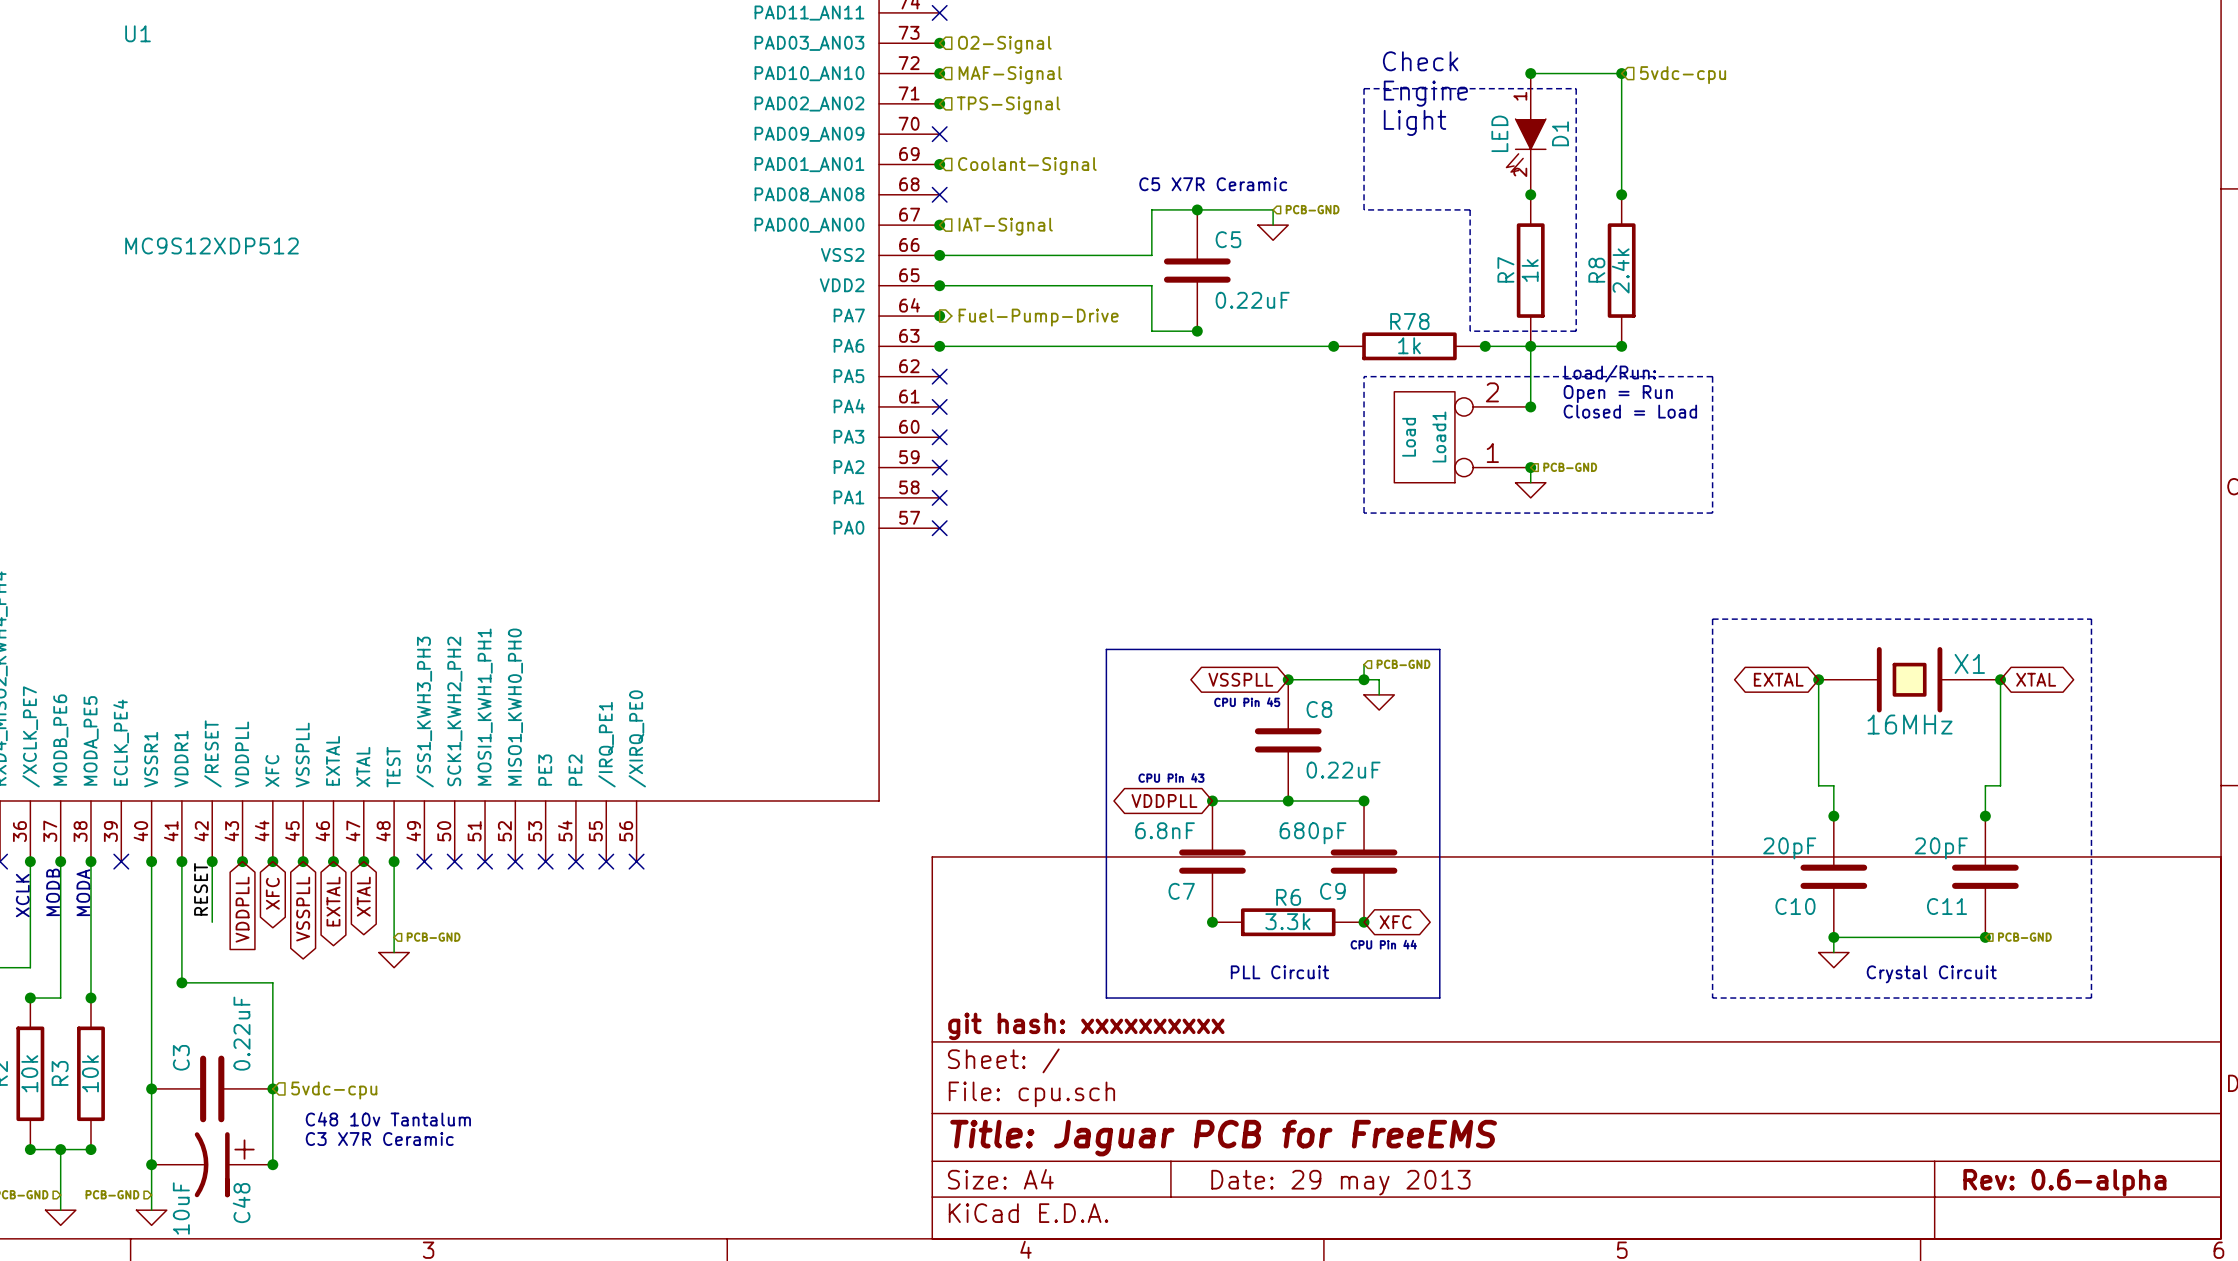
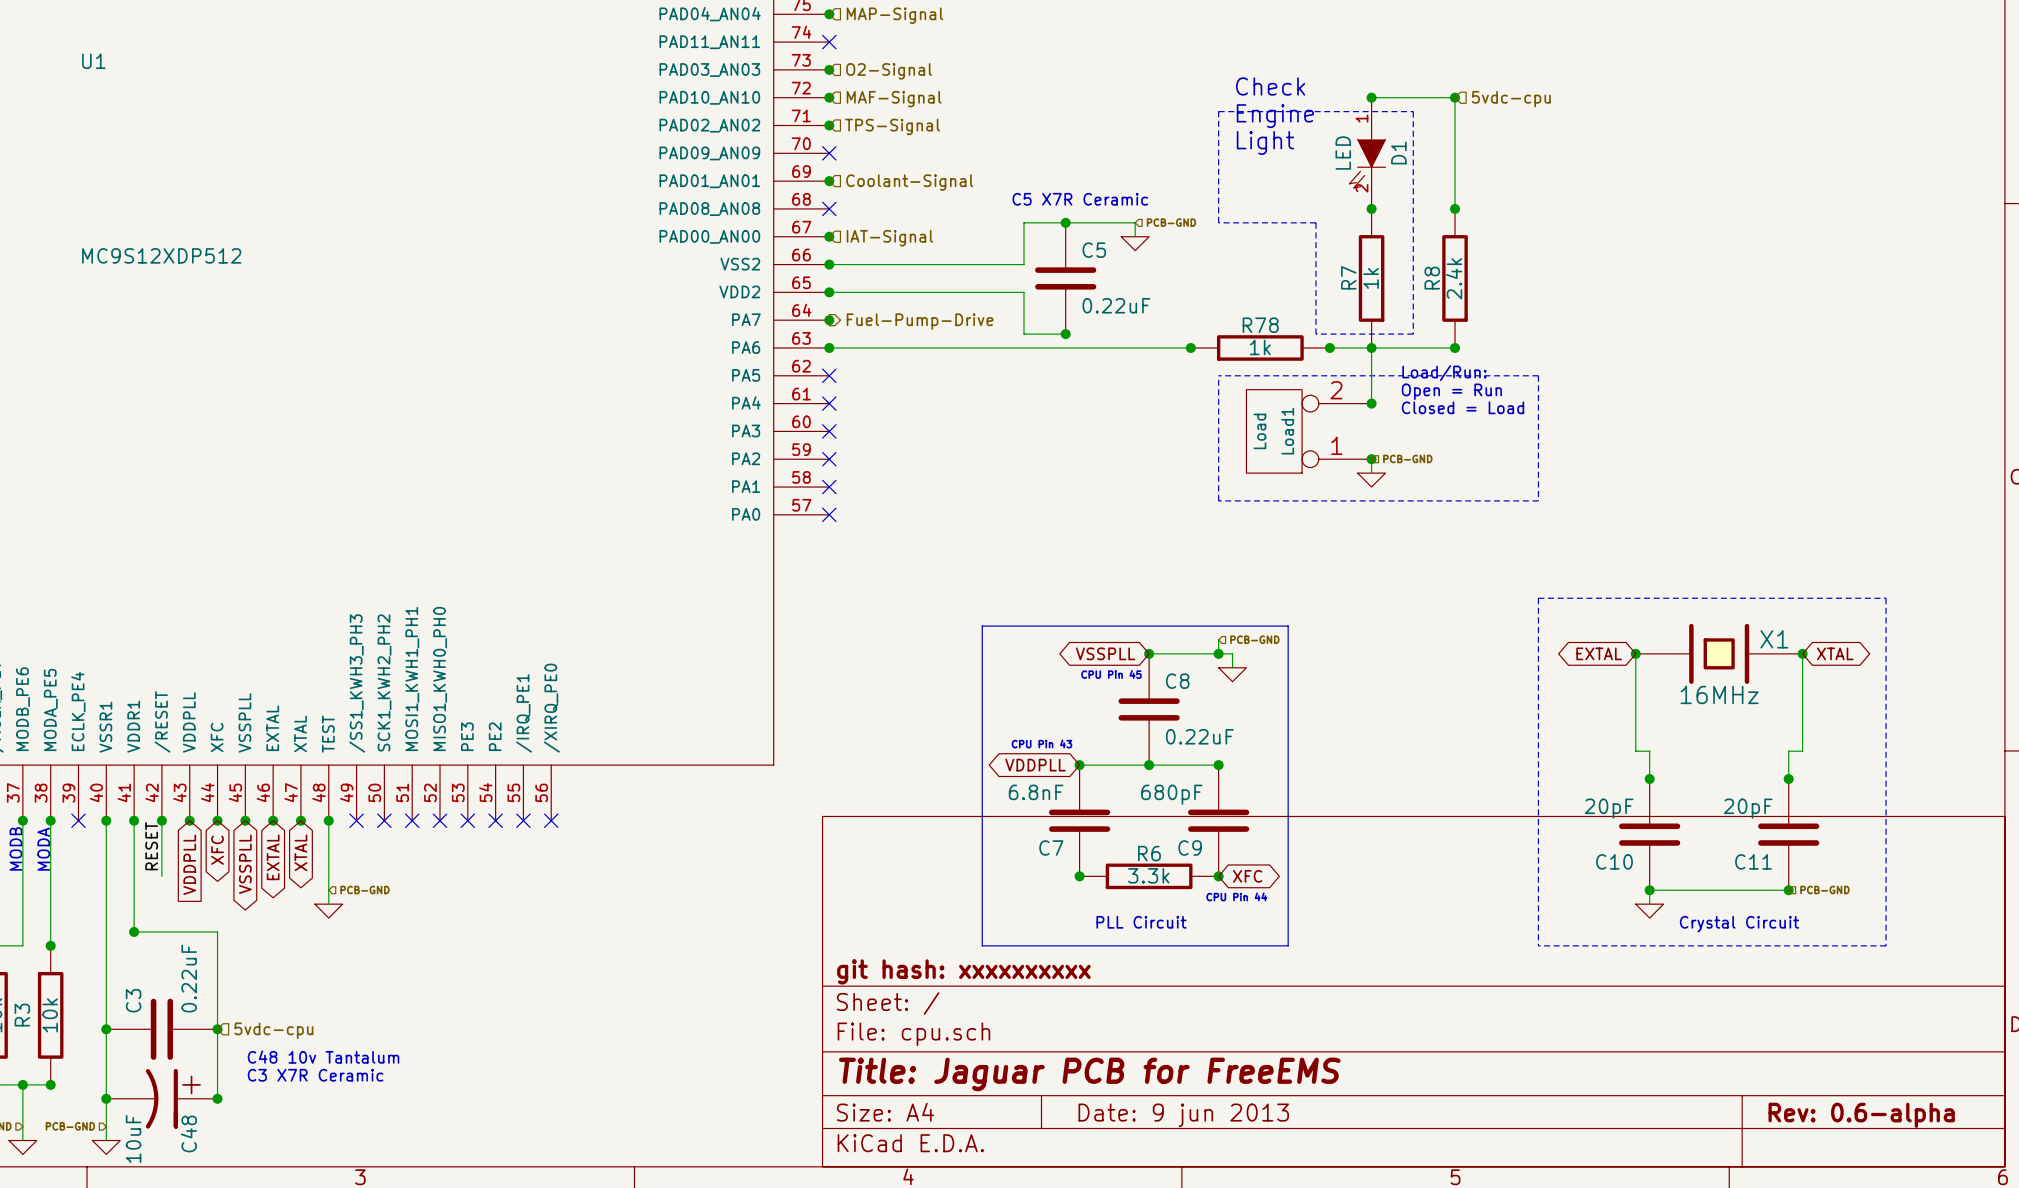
title block: Date: 29 may 2013 (1340, 1182) -> Date: 9 jun 2013 (1183, 1115)

